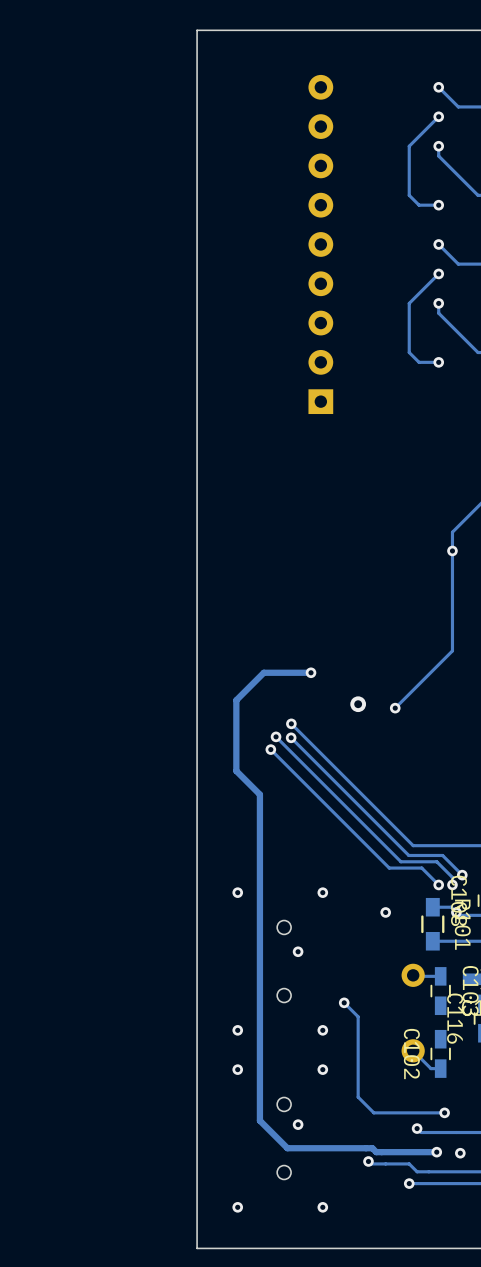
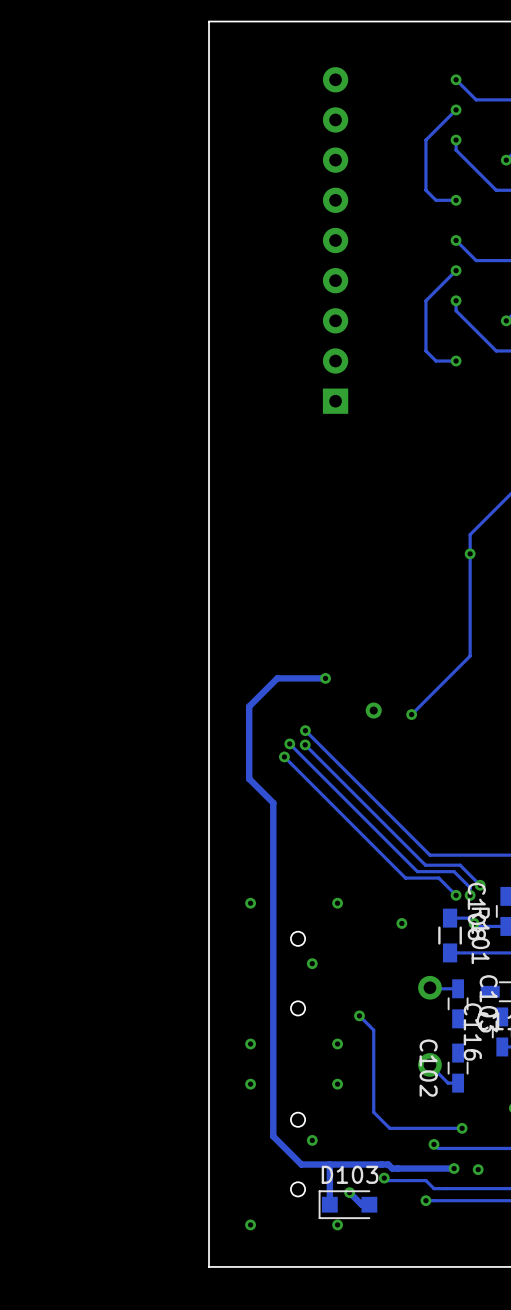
track: none -> (329, 1164) (329, 1204)
track: none -> (349, 1192) (361, 1204) (369, 1204)
via: none -> (349, 1192)
D103: none -> (347, 1204)

